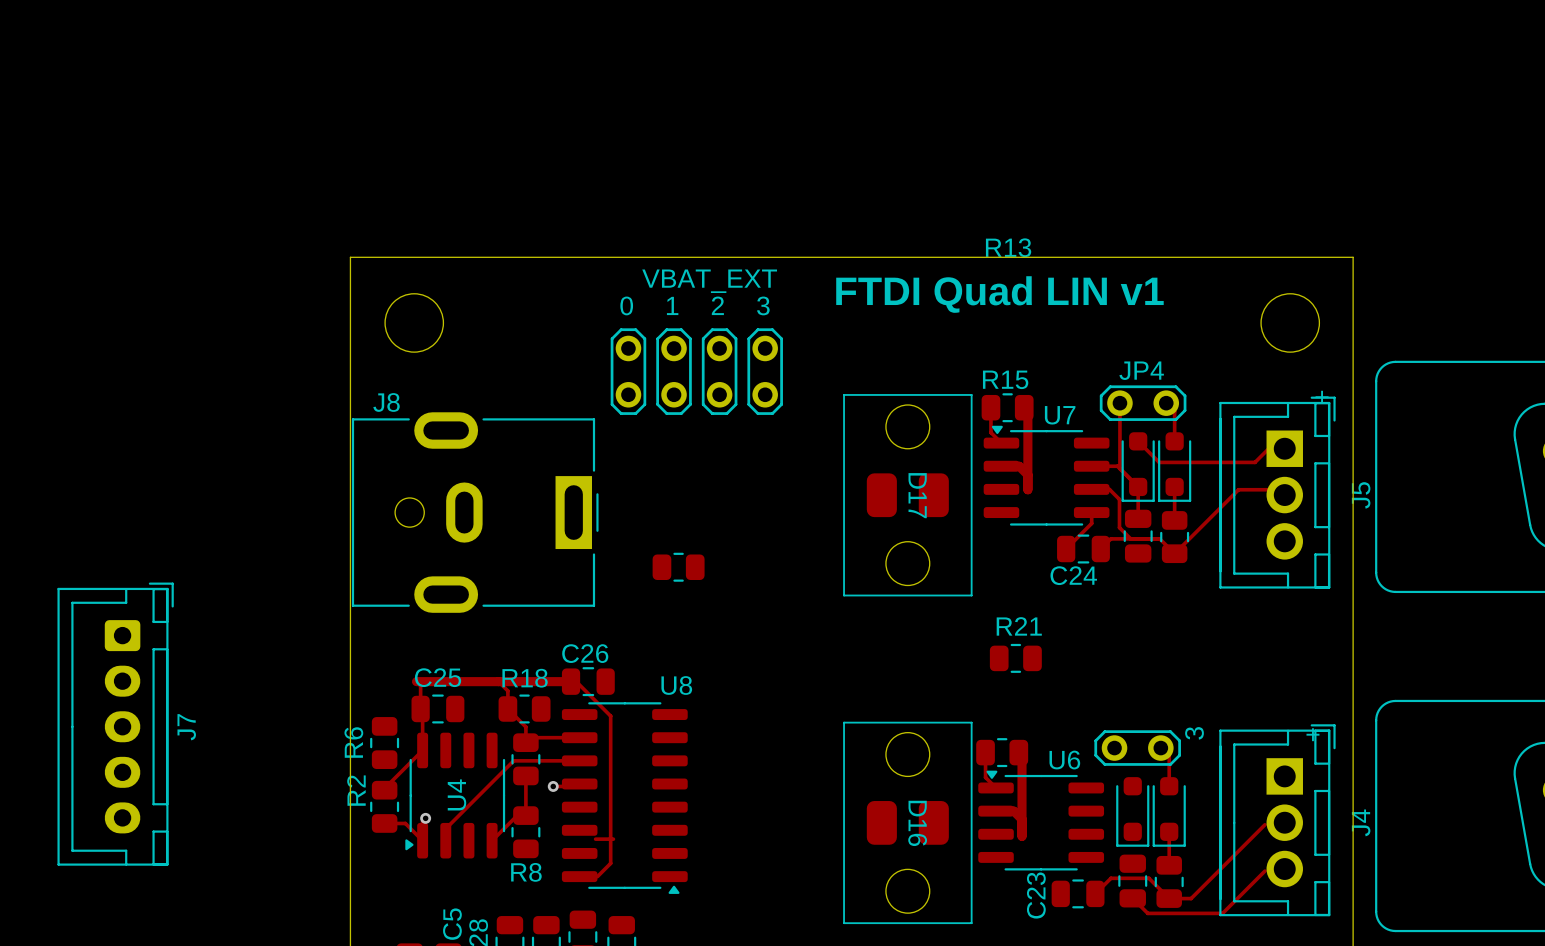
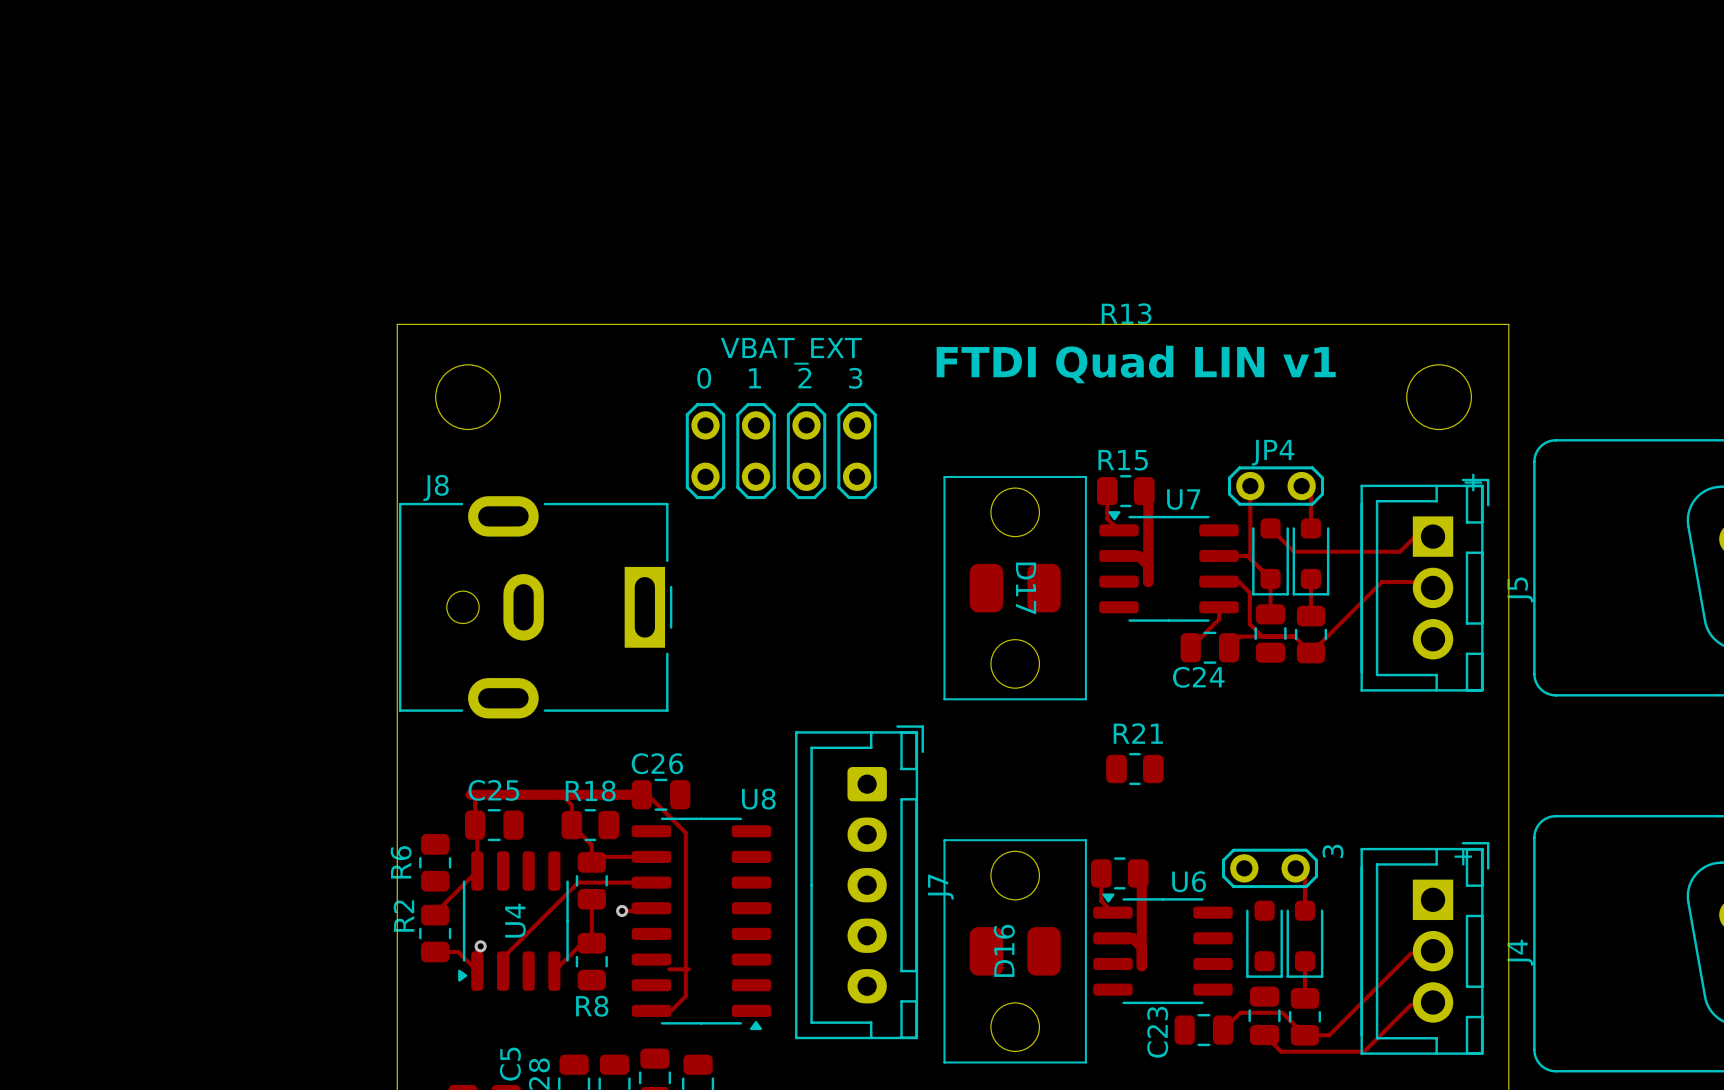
part: (678, 567) -> none
J7 position: (115, 724) -> (859, 882)
D16 name rotation: 0° (917, 823) -> 180° (1004, 950)

